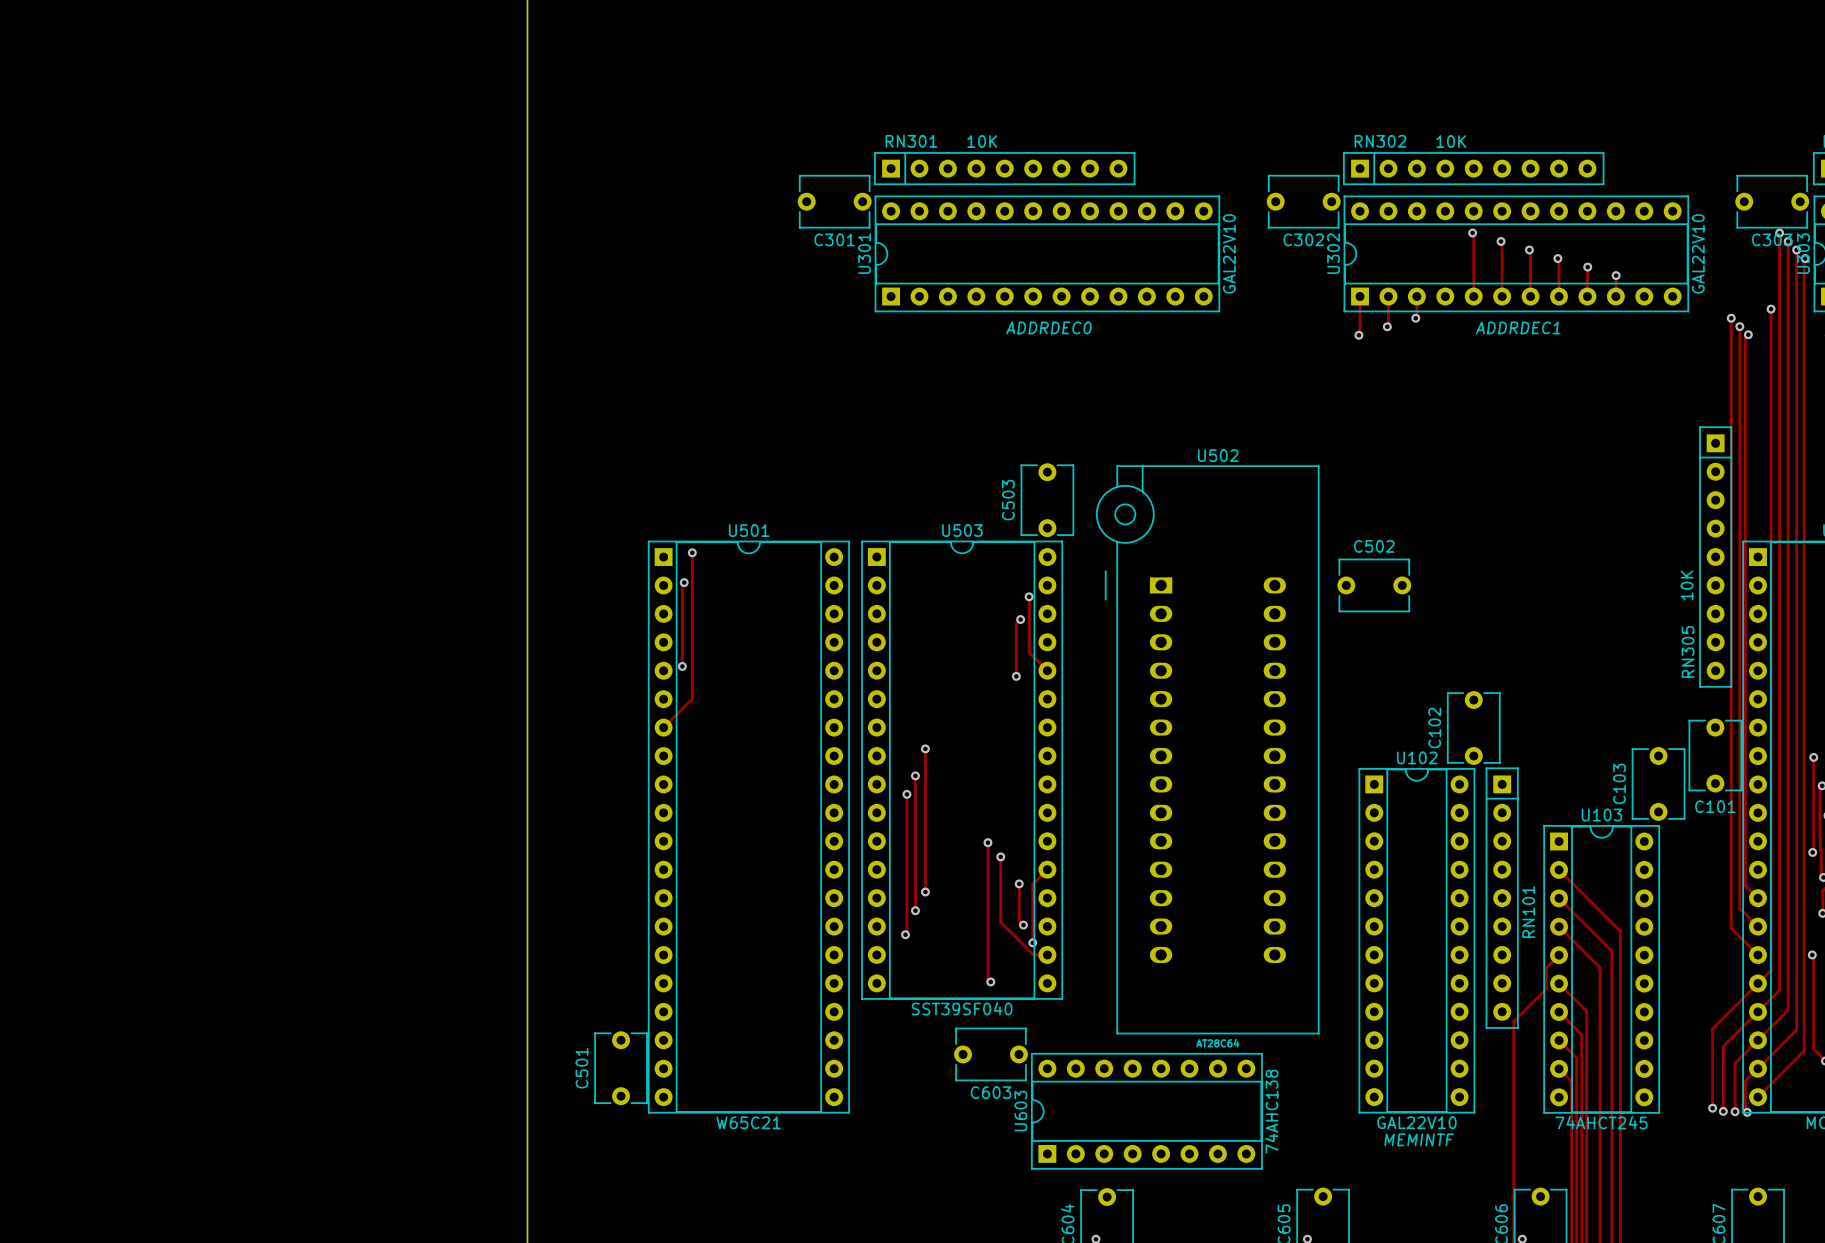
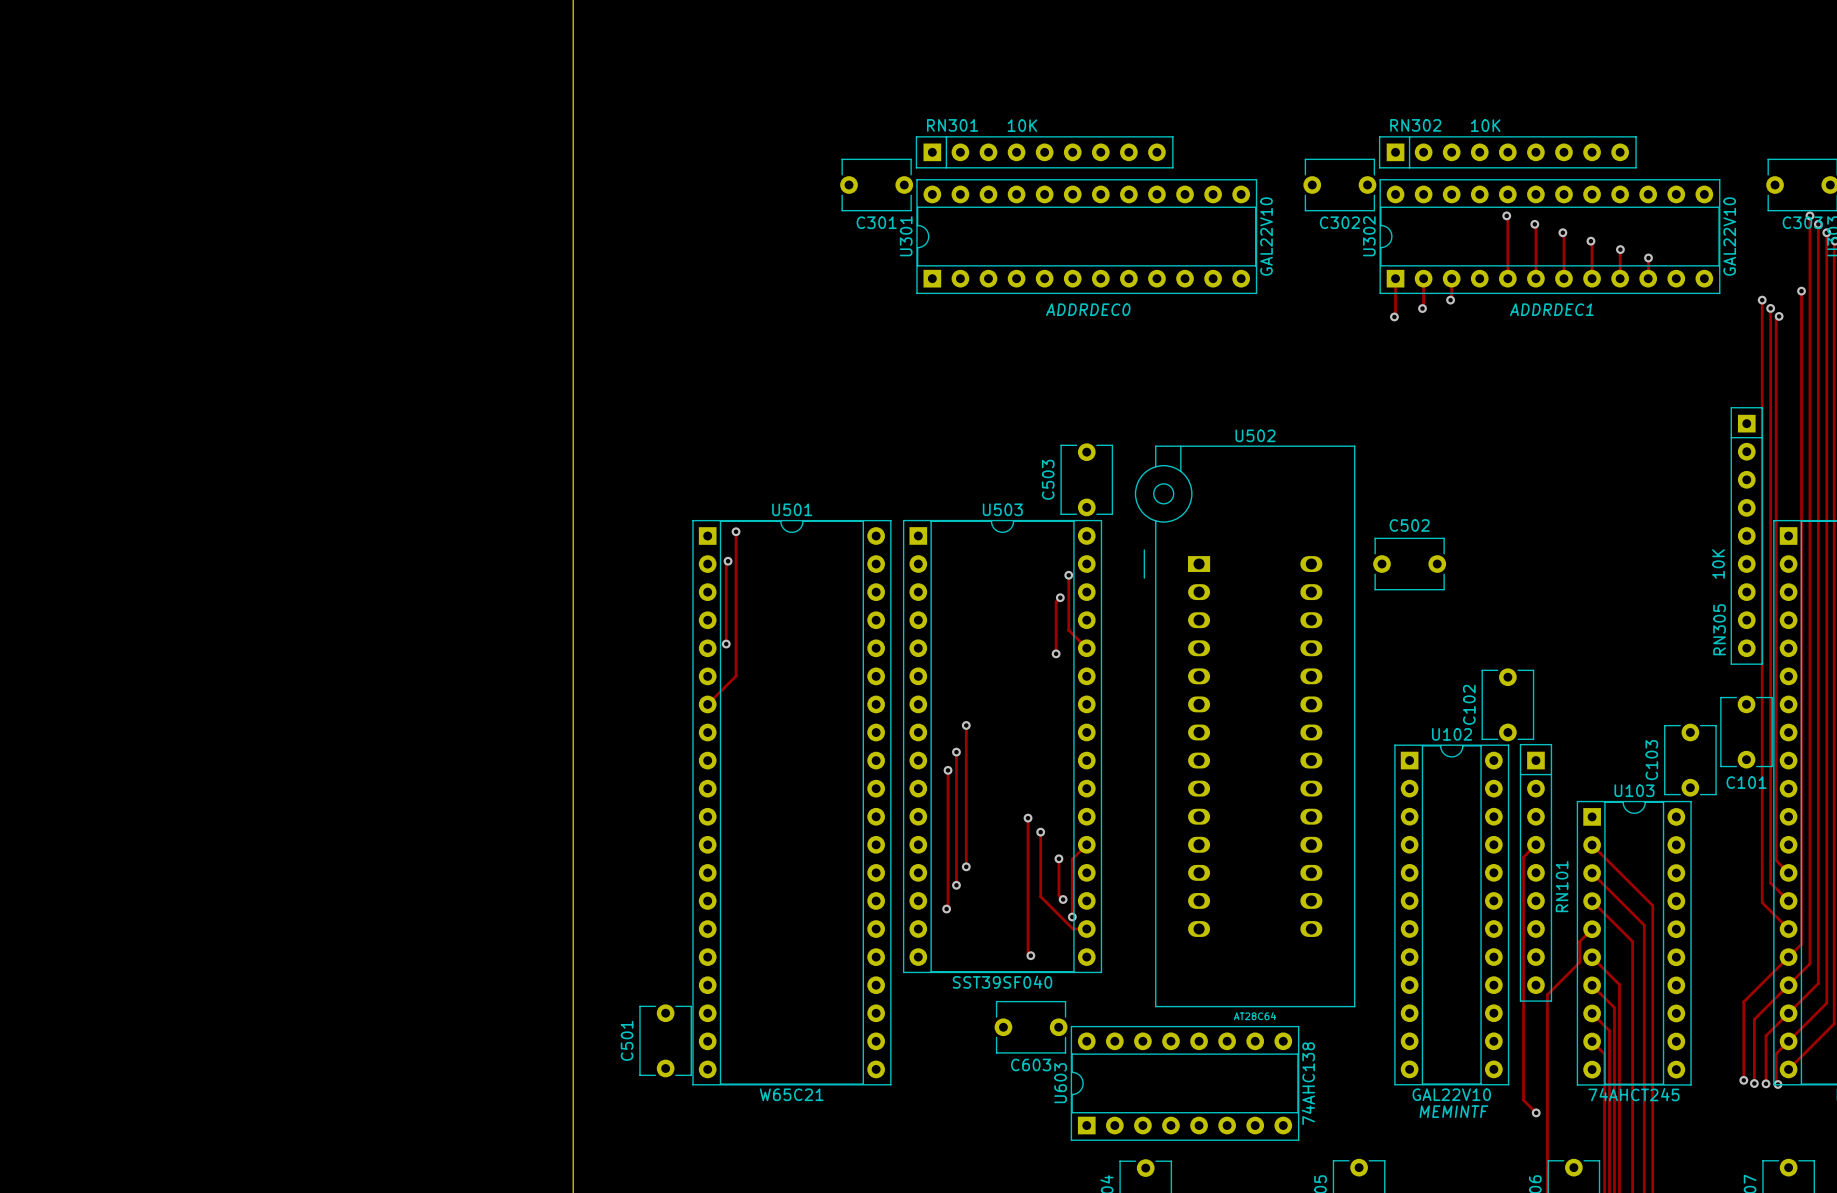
track: none -> (1535, 844) (1523, 857) (1523, 1100) (1536, 1112)
via: none -> (1536, 1112)

